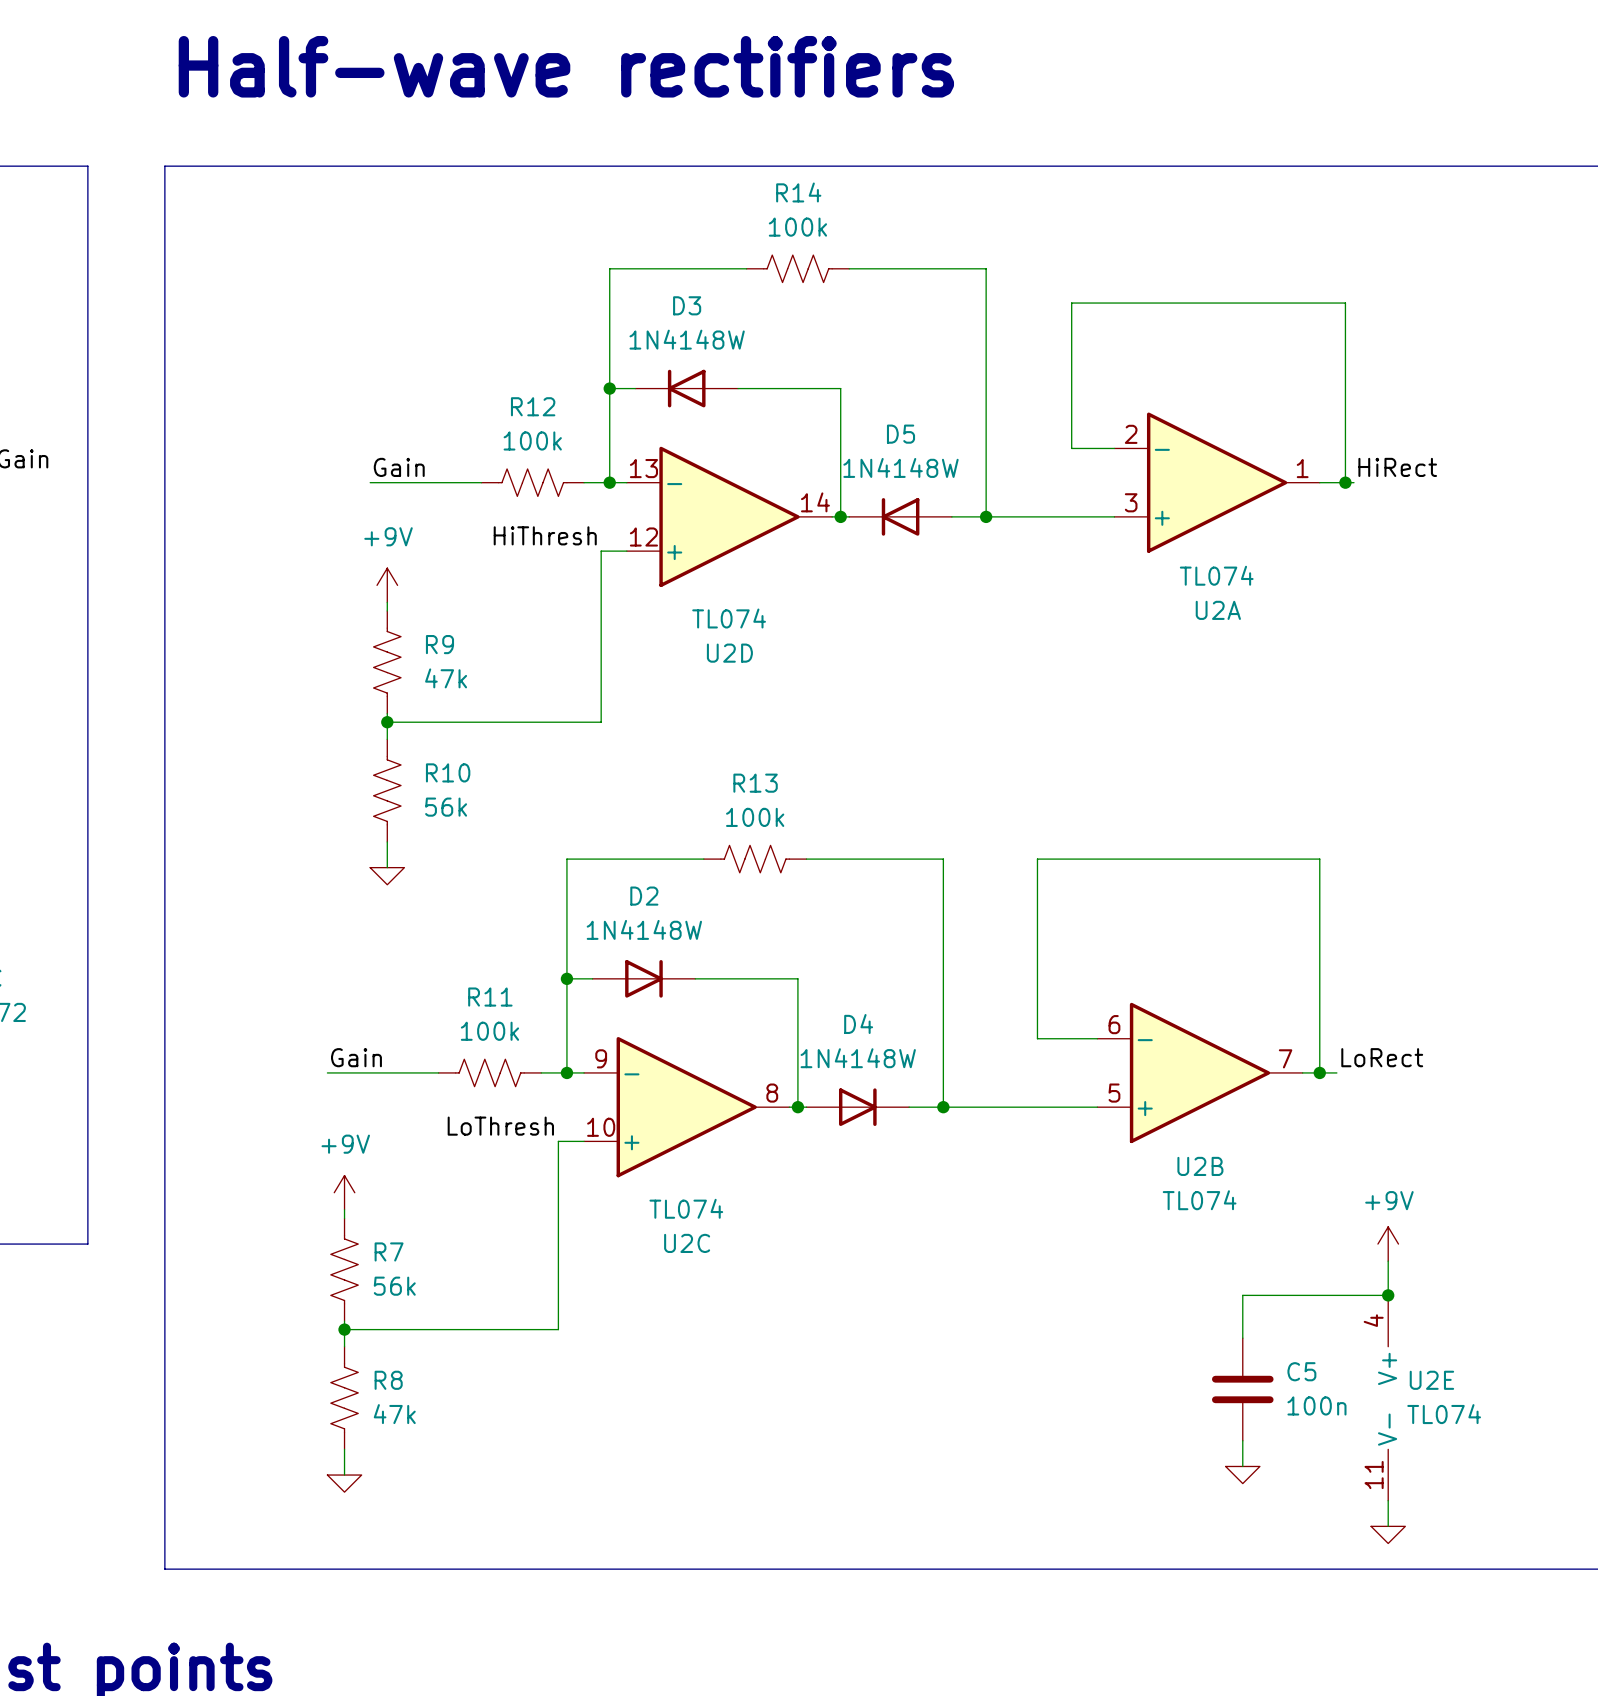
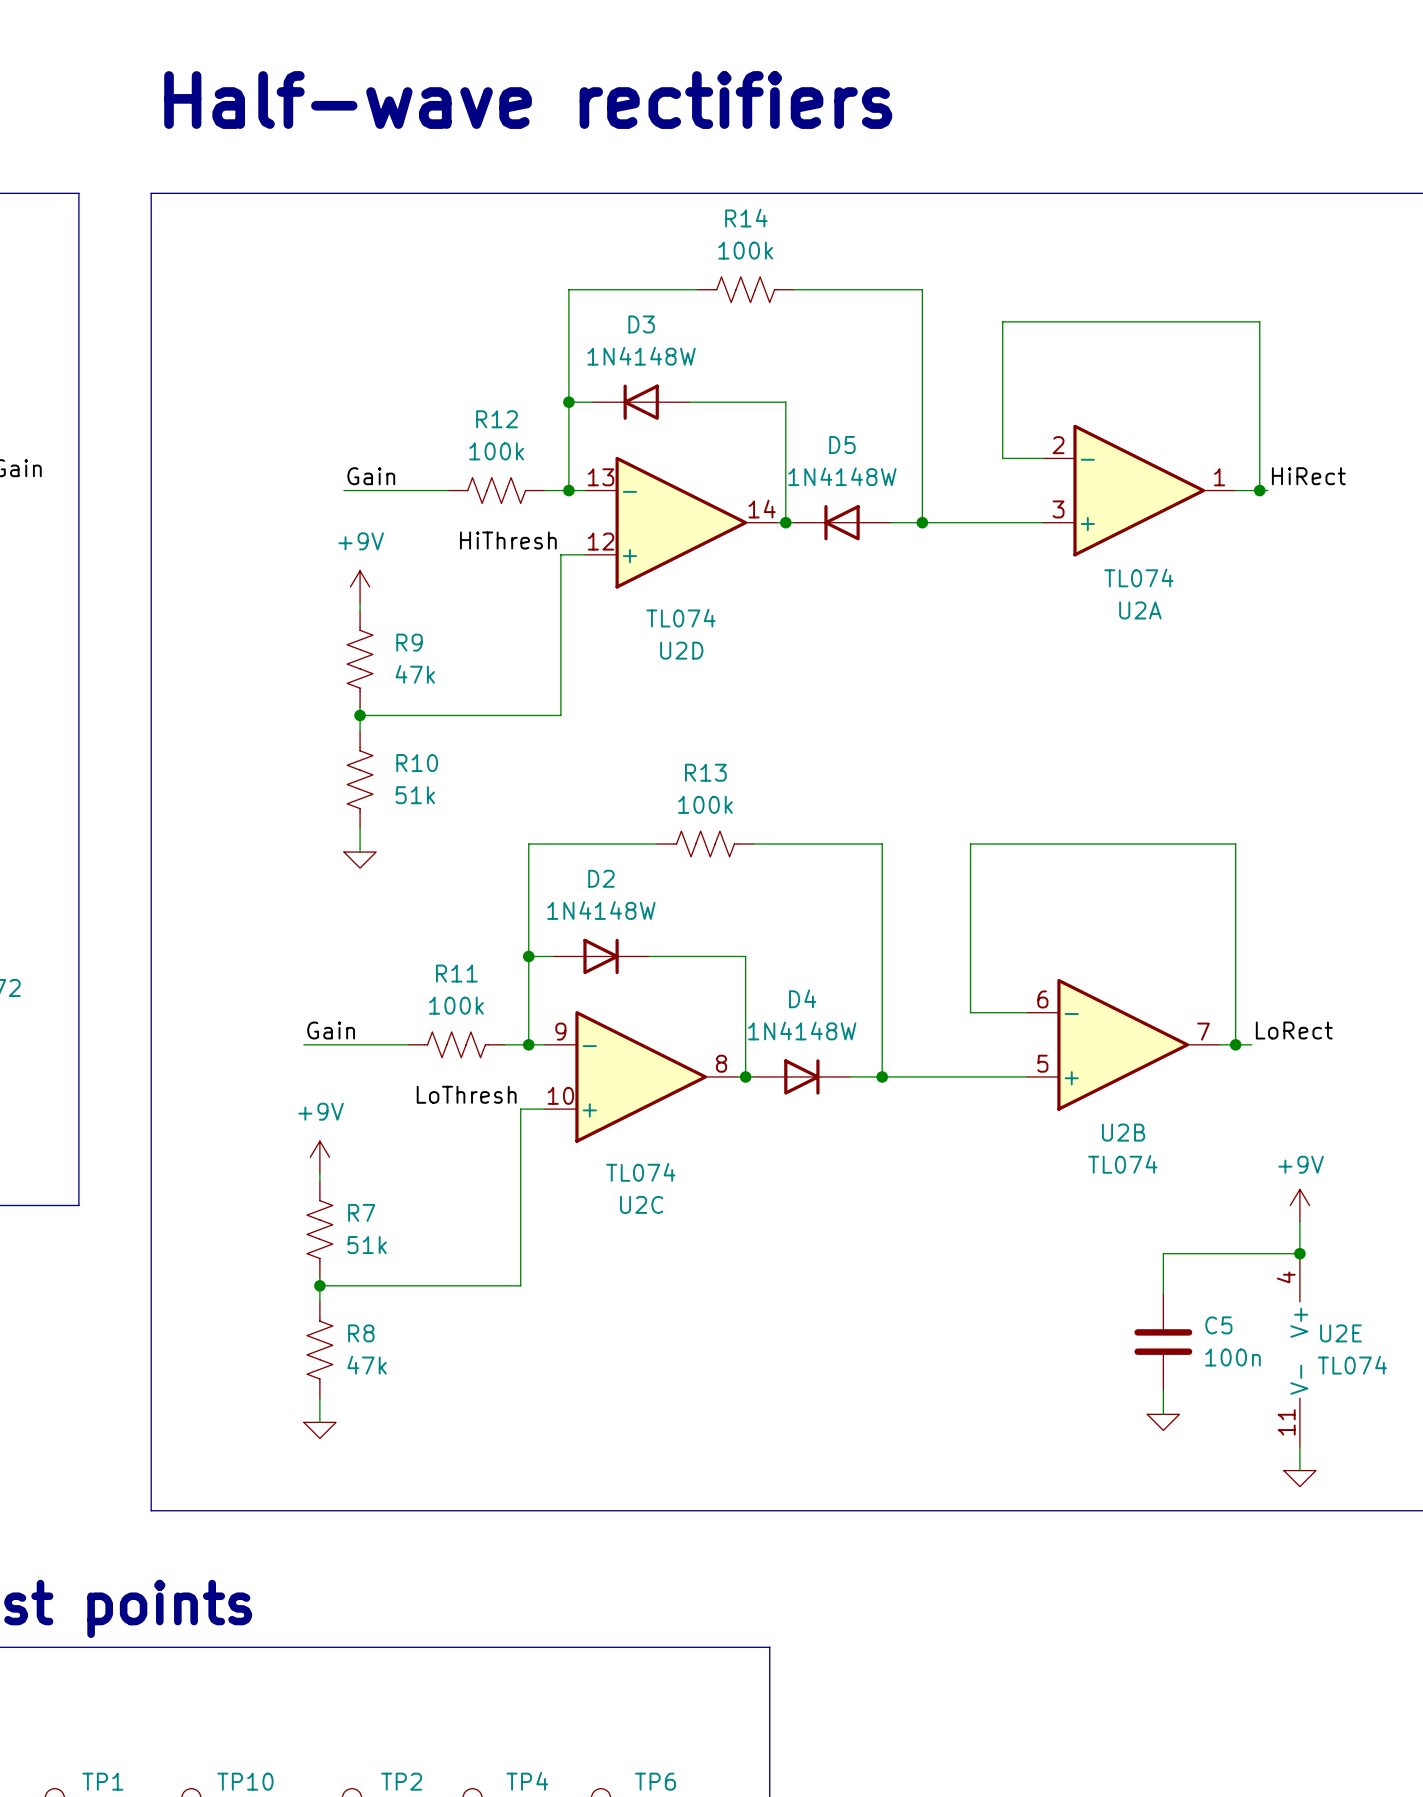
R10 value: 56k (446, 807) -> 51k (415, 795)
R7 value: 56k (394, 1286) -> 51k (367, 1245)

